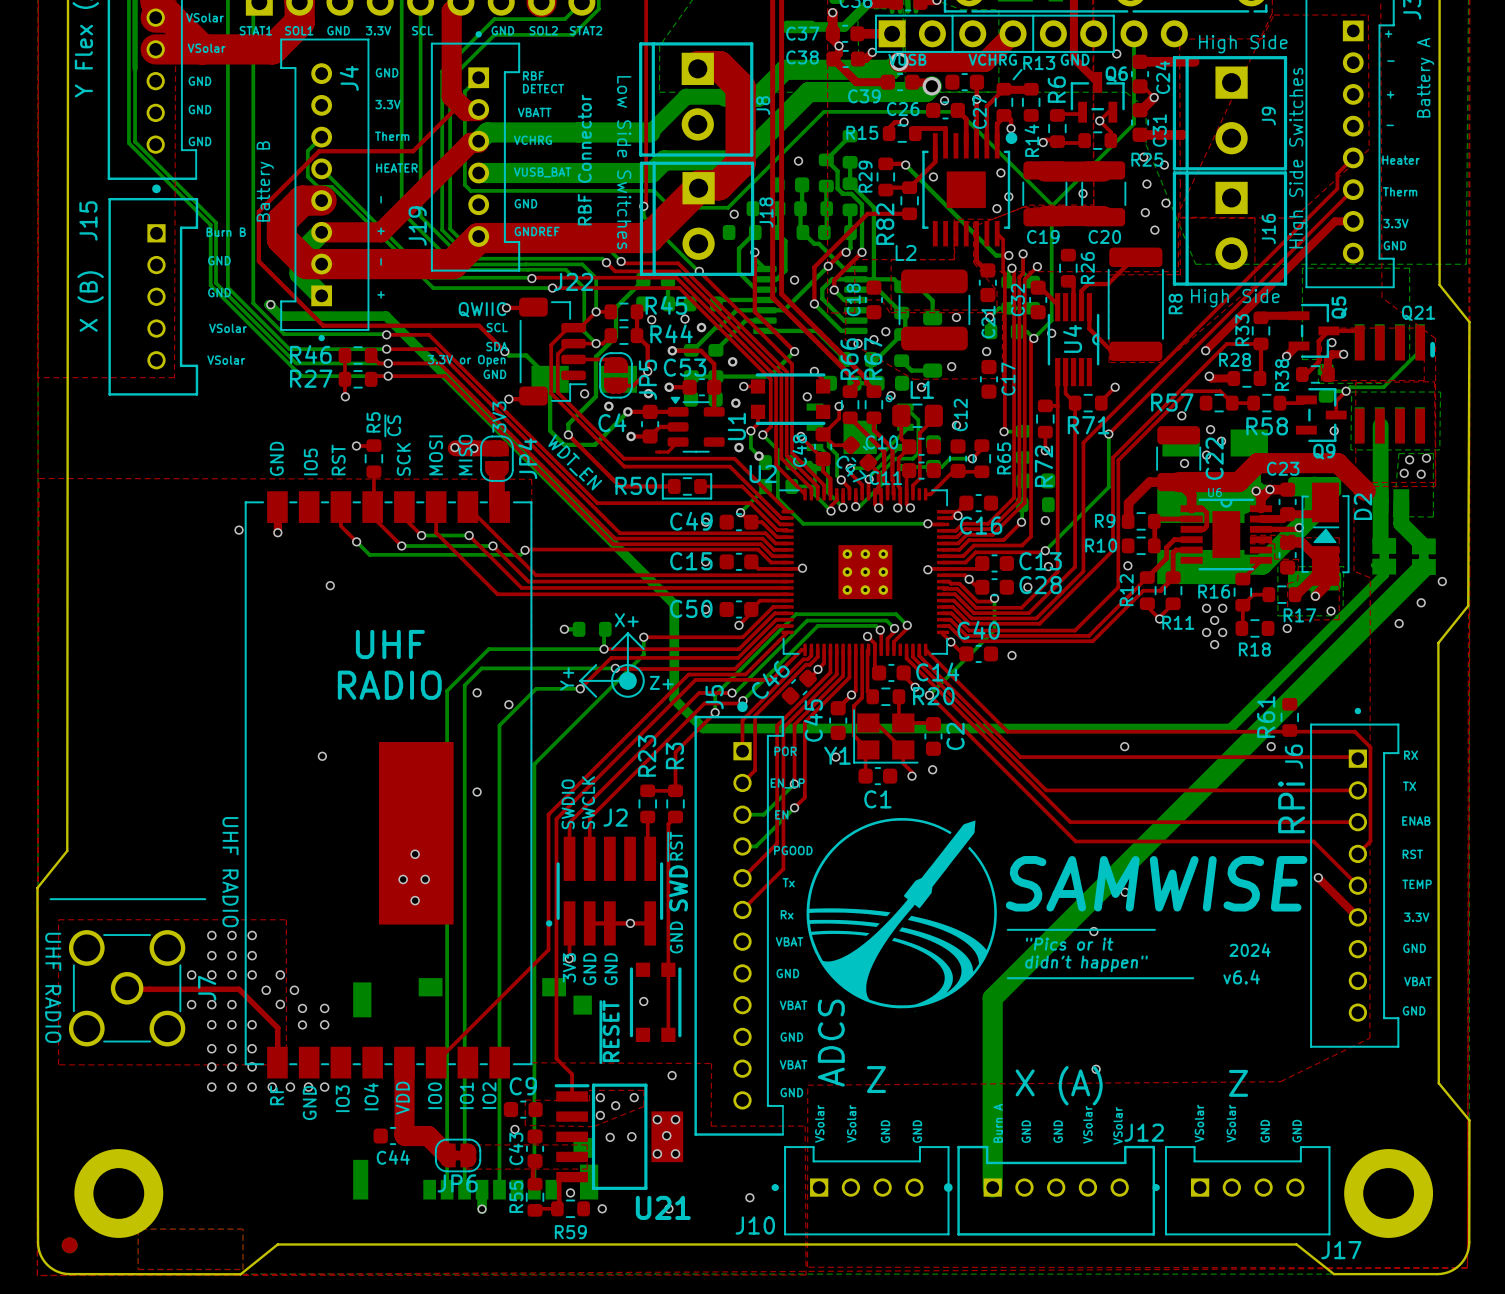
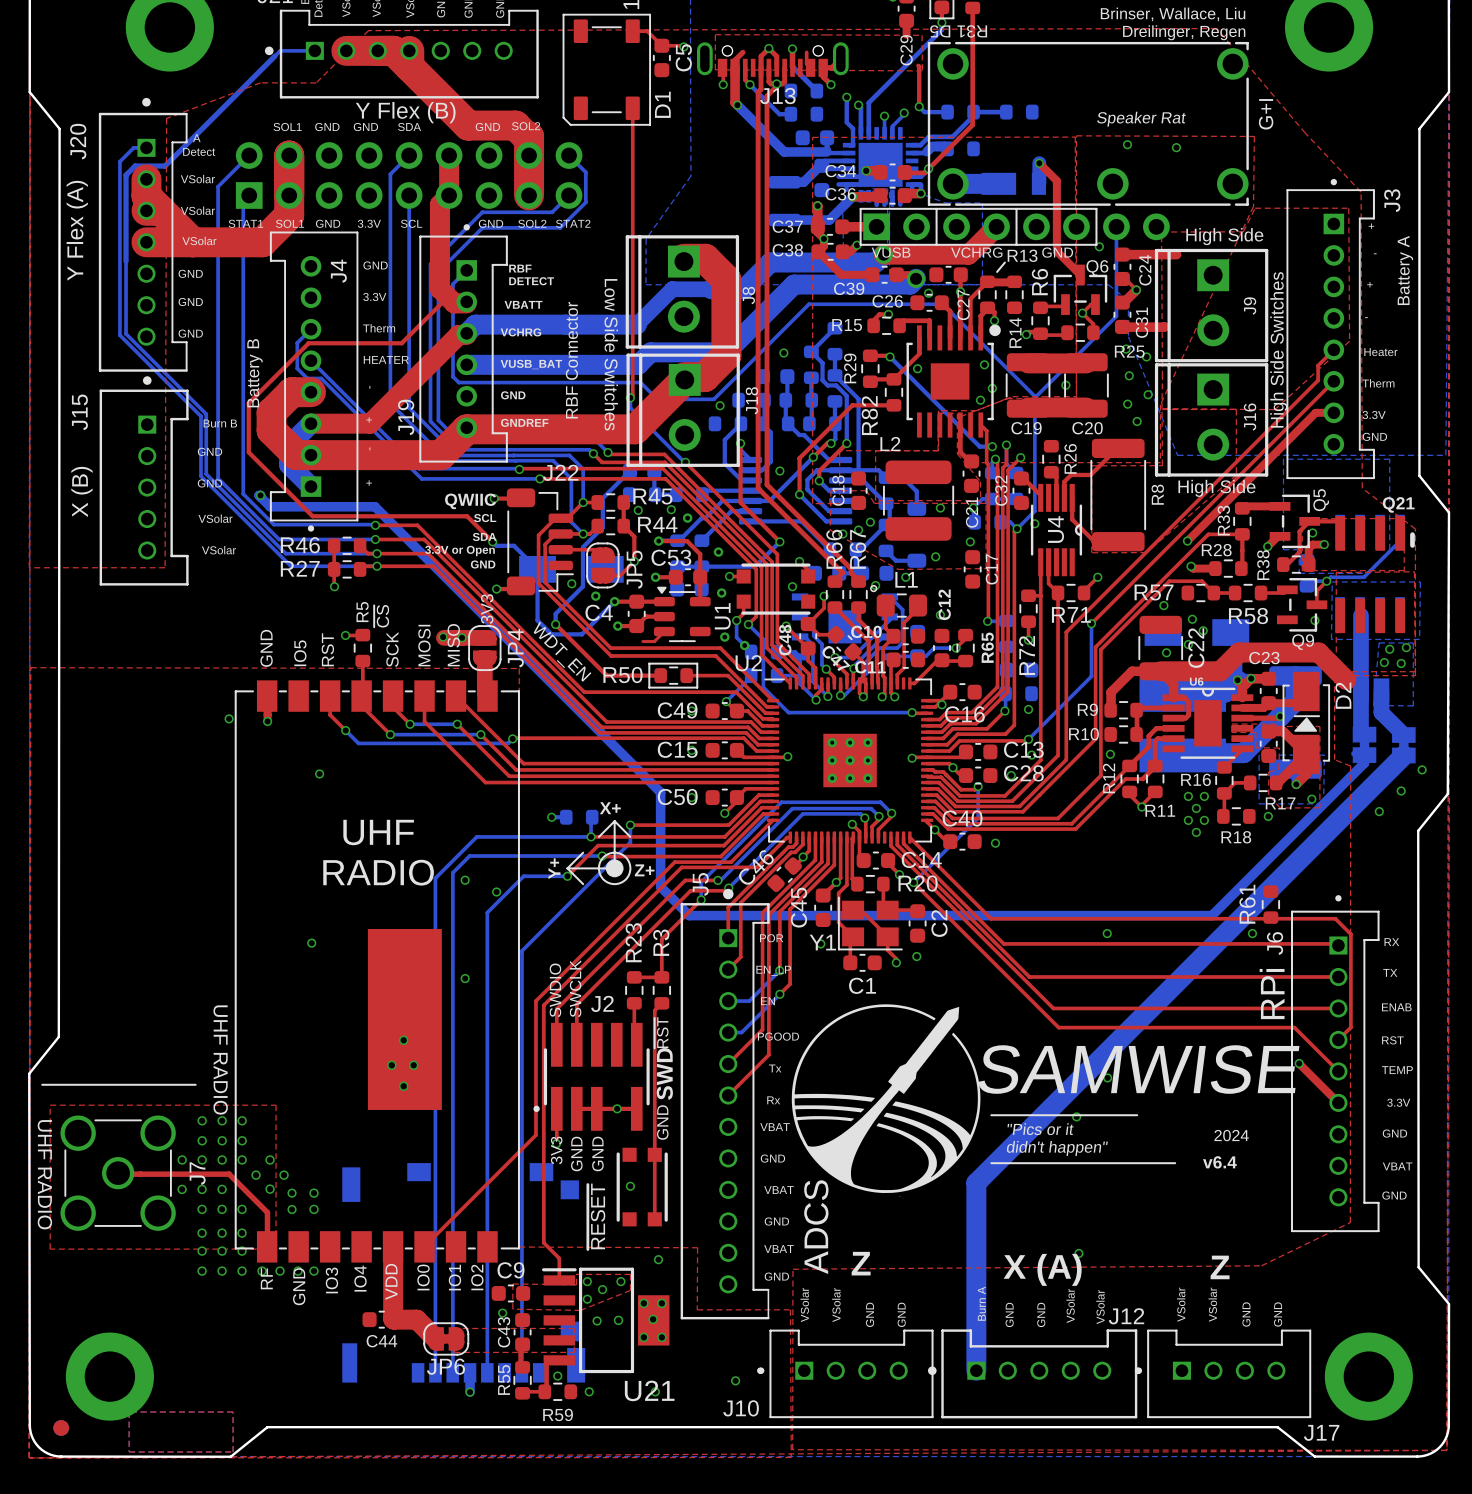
via: (648, 393) -> none

